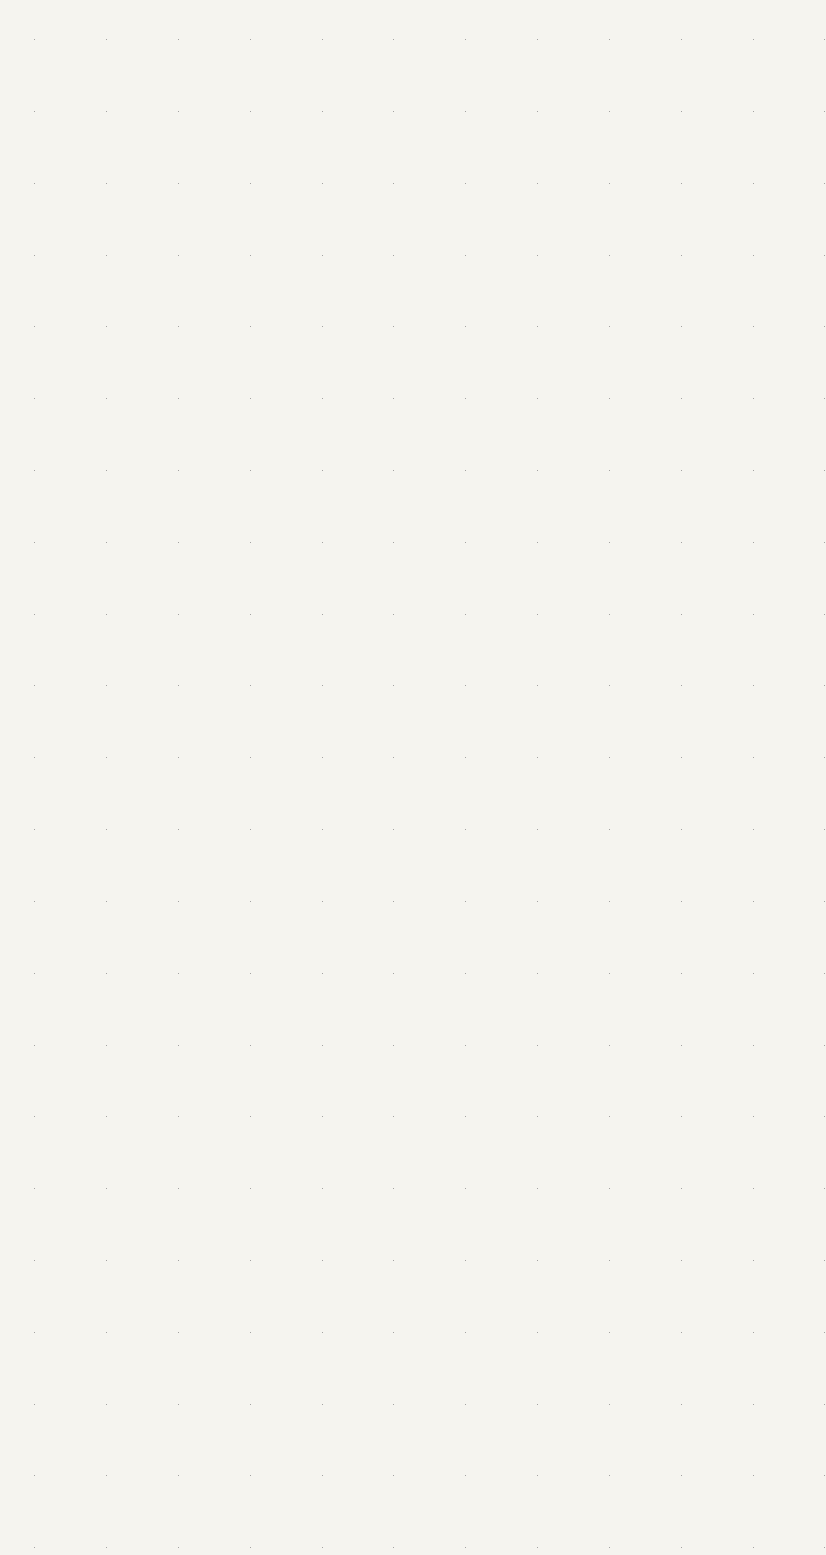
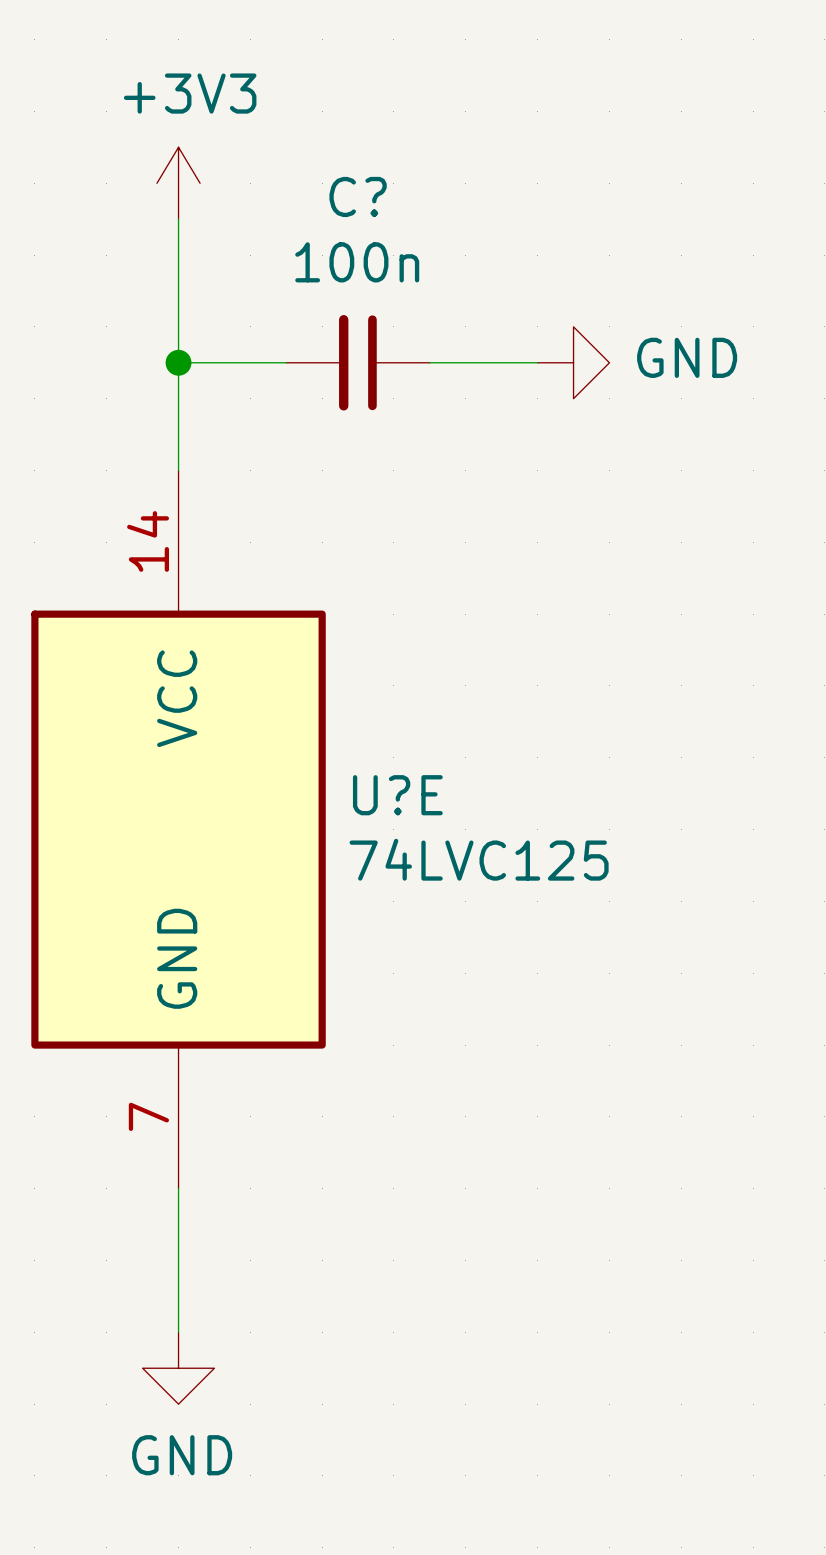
power symbol: none -> +3V3 (178, 183)
wire: none -> (178, 219) (178, 470)
wire: none -> (178, 362) (286, 362)
junction: none -> (178, 362)
C?: none -> 100n (358, 362)
wire: none -> (429, 362) (537, 362)
power symbol: none -> GND (573, 362)
U?E: none -> 74LVC125 (178, 829)
wire: none -> (178, 1188) (178, 1332)
power symbol: none -> GND (178, 1368)

